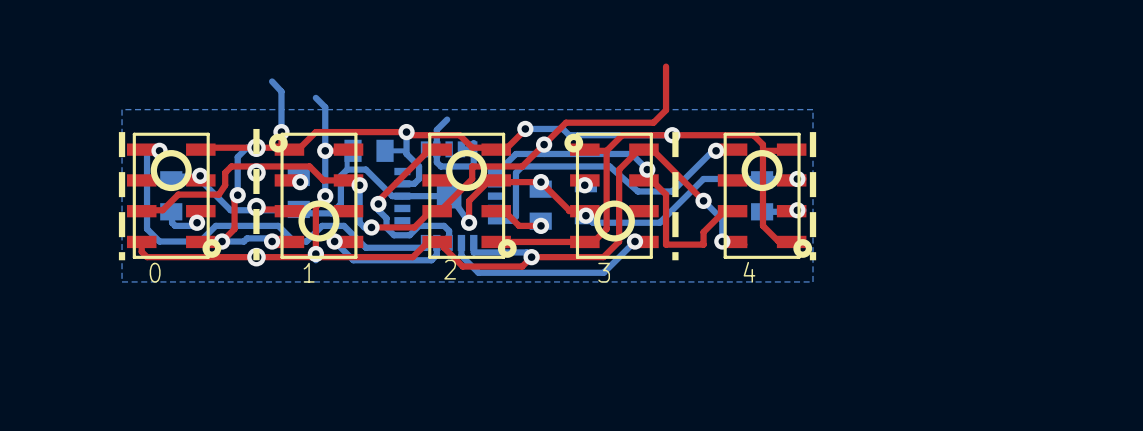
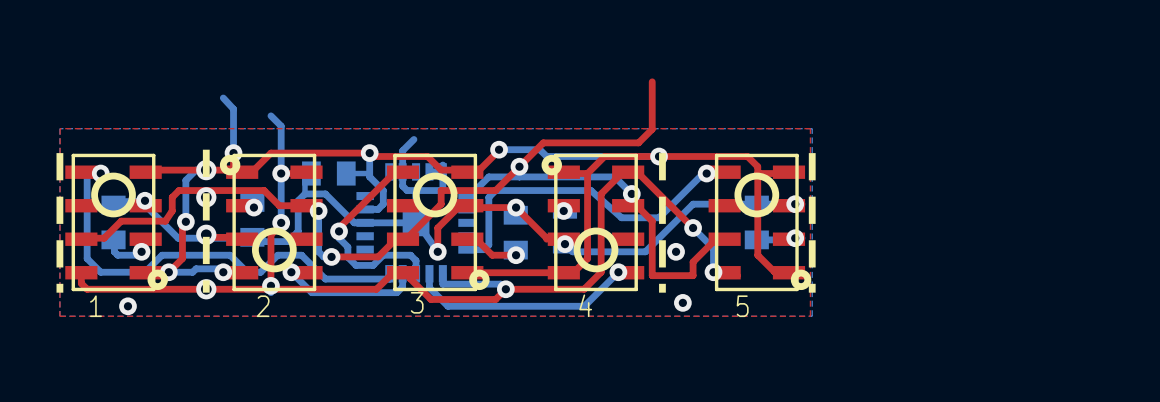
top zone outline: none -> (60, 128) (59, 316) (810, 316) (810, 128) (60, 128)
via: none -> (676, 251)
2 name: 2 (450, 269) -> 3 (417, 302)
via: none -> (682, 302)
0 name: 0 (155, 272) -> 1 (95, 306)
via: none -> (127, 306)
1 name: 1 (309, 272) -> 2 (263, 306)
3 name: 3 (604, 272) -> 4 (585, 305)
4 name: 4 (749, 272) -> 5 (742, 306)

